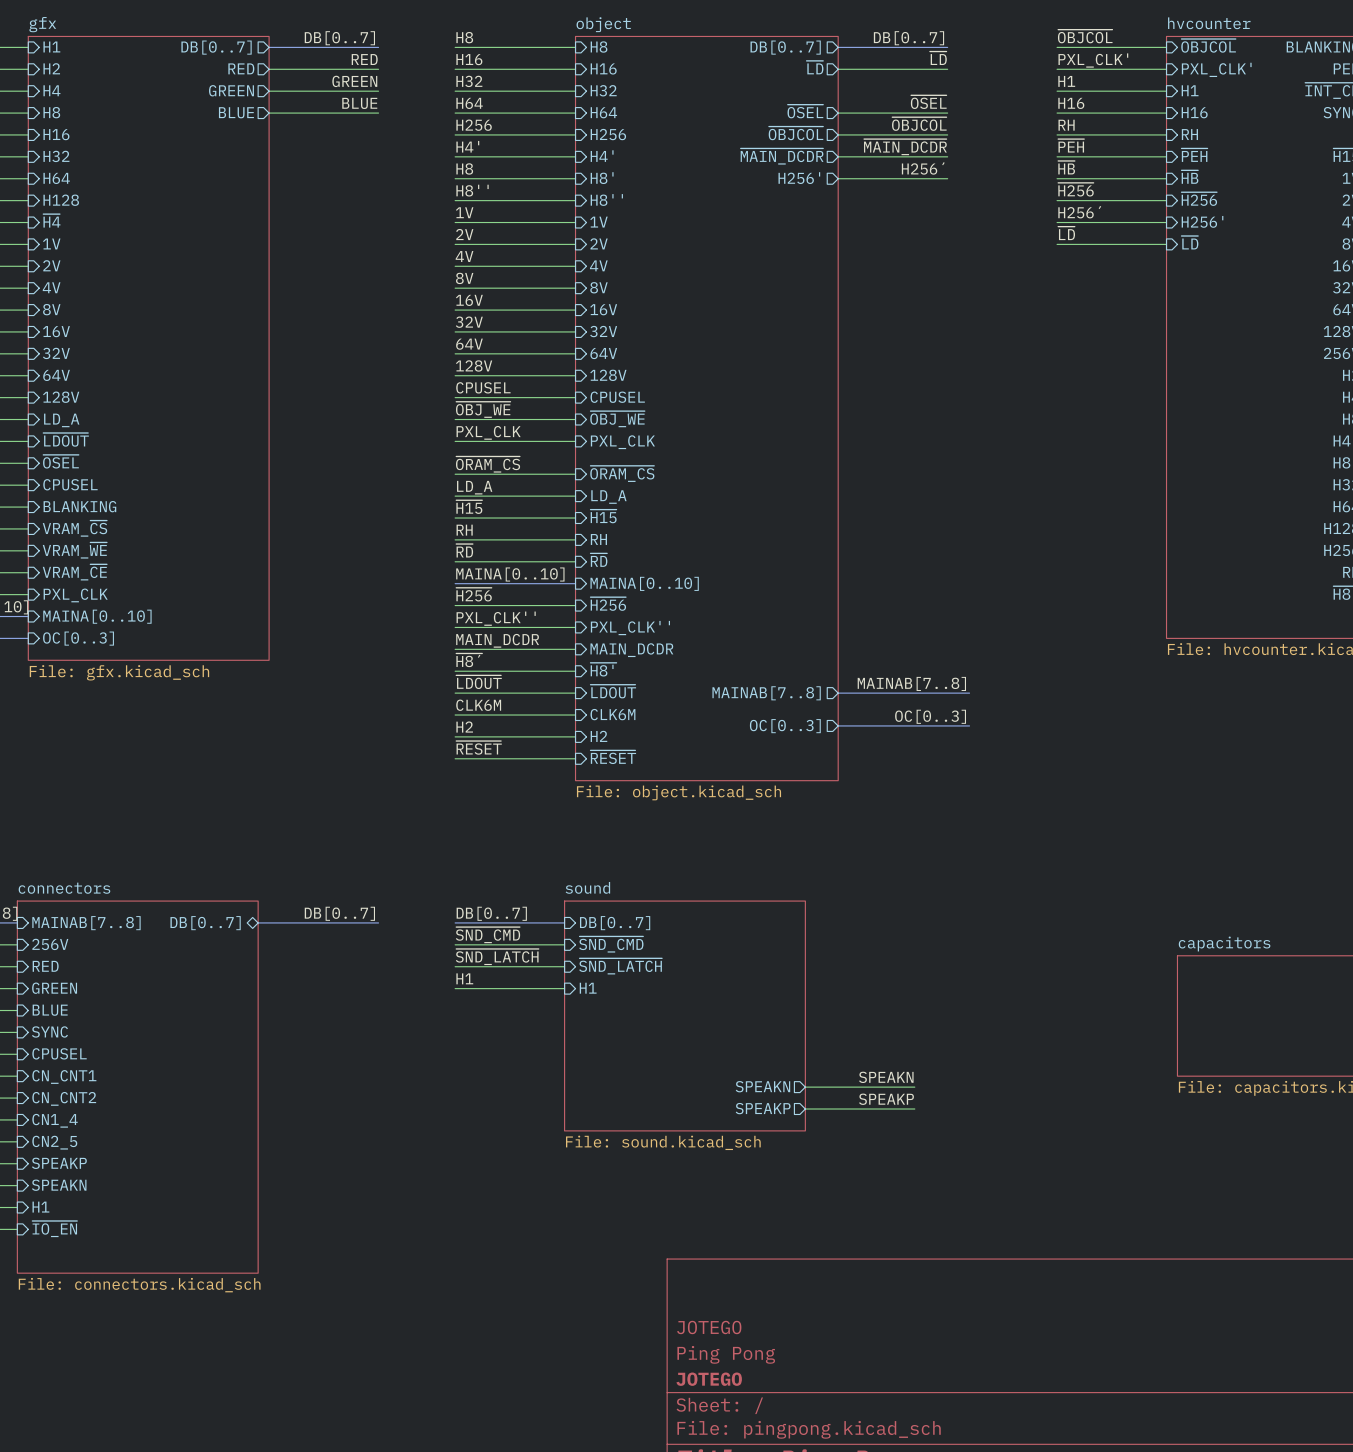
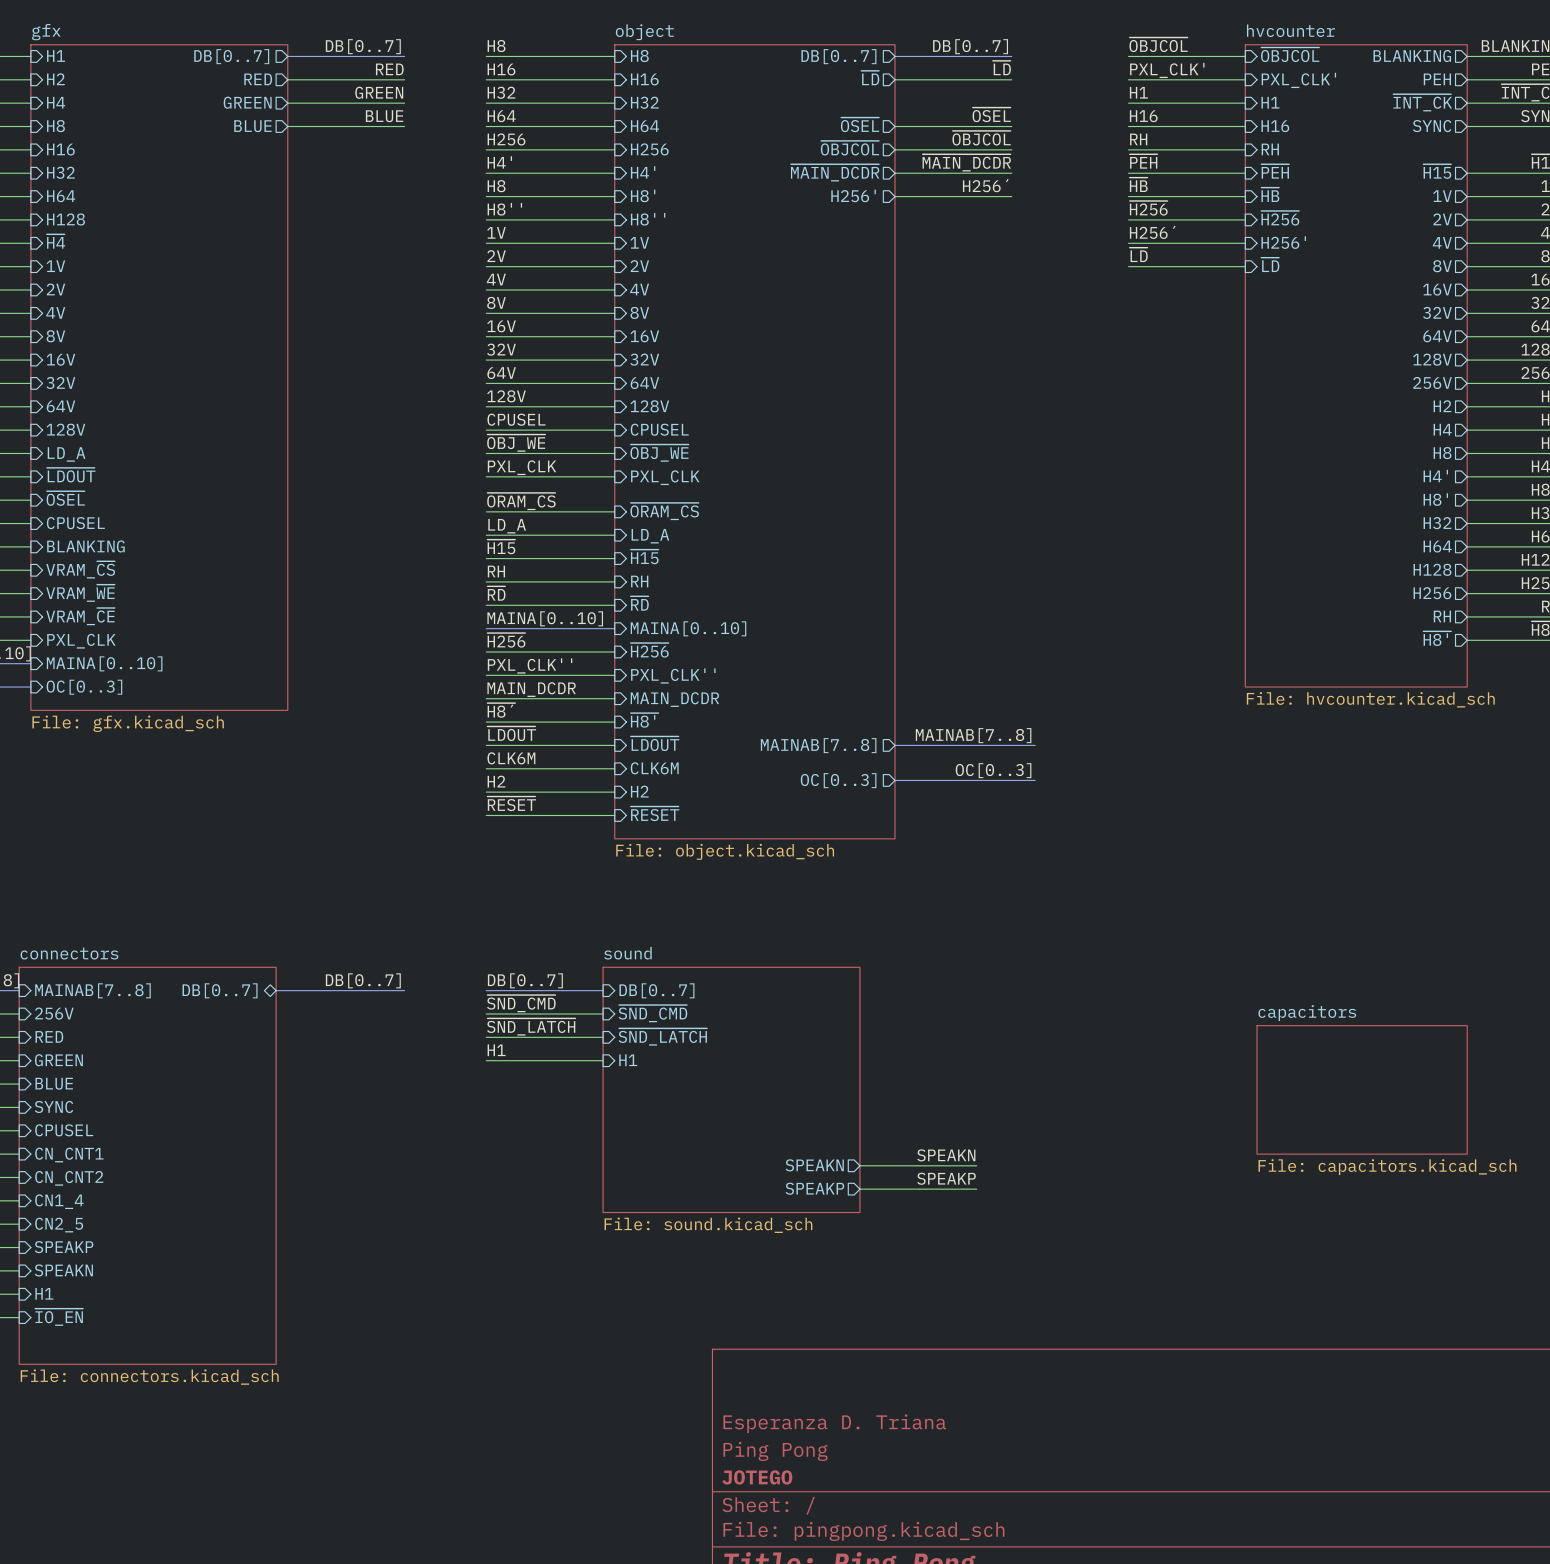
title block: JOTEGO (709, 1327) -> Esperanza D. Triana (834, 1423)

